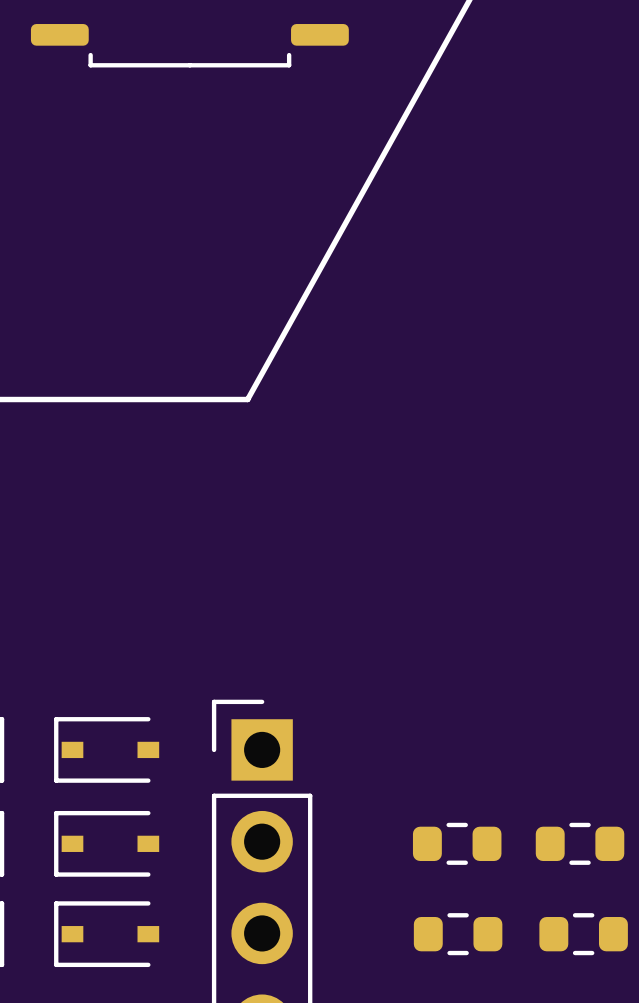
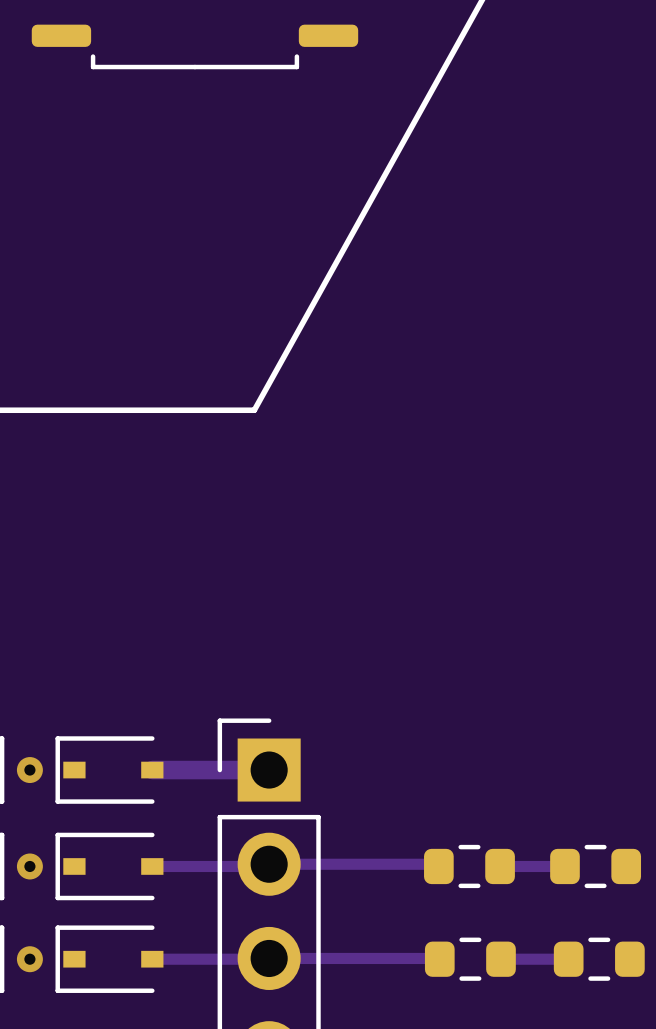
via: none -> (29, 770)
track: none -> (152, 770) (269, 770)
via: none -> (29, 866)
track: none -> (152, 866) (266, 866) (269, 864) (436, 864) (438, 866)
track: none -> (500, 866) (564, 866)
via: none -> (29, 959)
track: none -> (152, 959) (439, 959)
track: none -> (500, 959) (568, 959)

